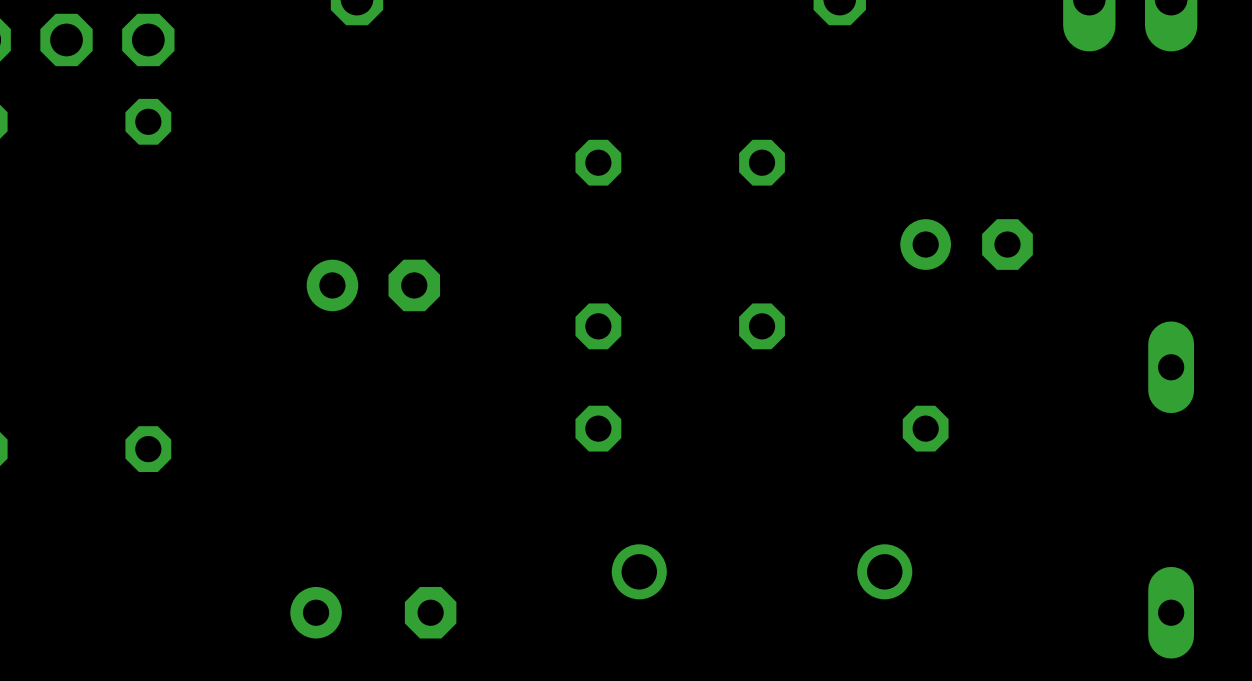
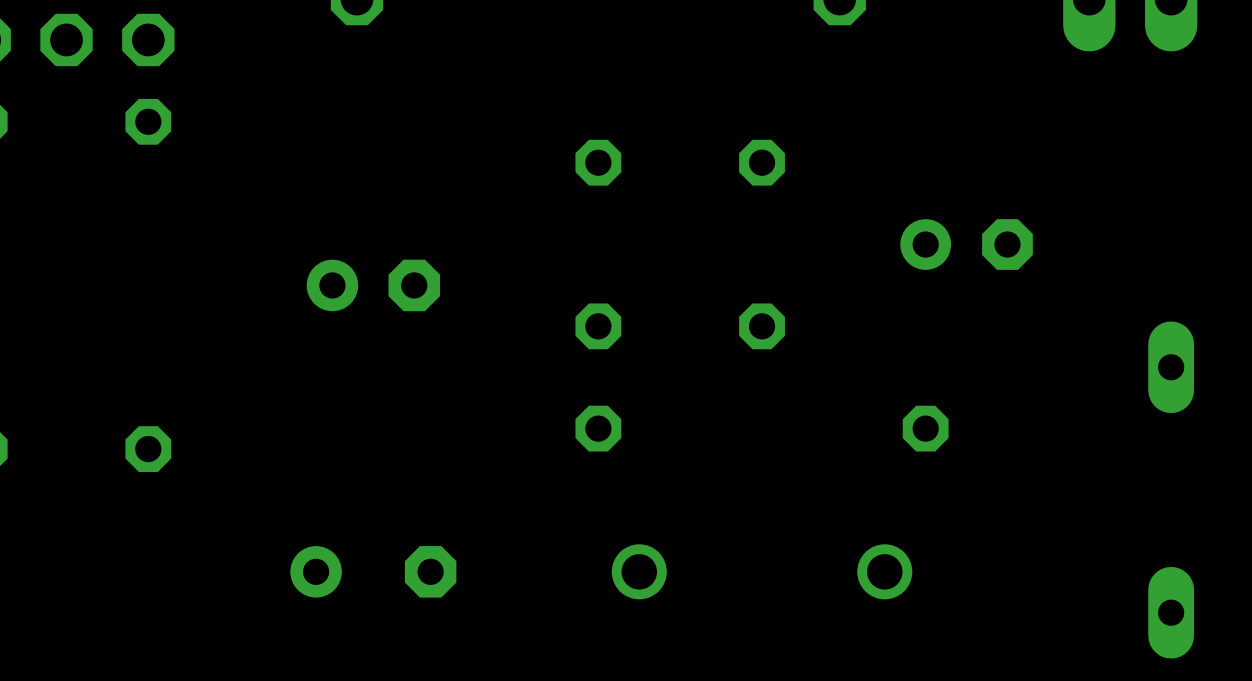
part position: (373, 612) -> (373, 571)

